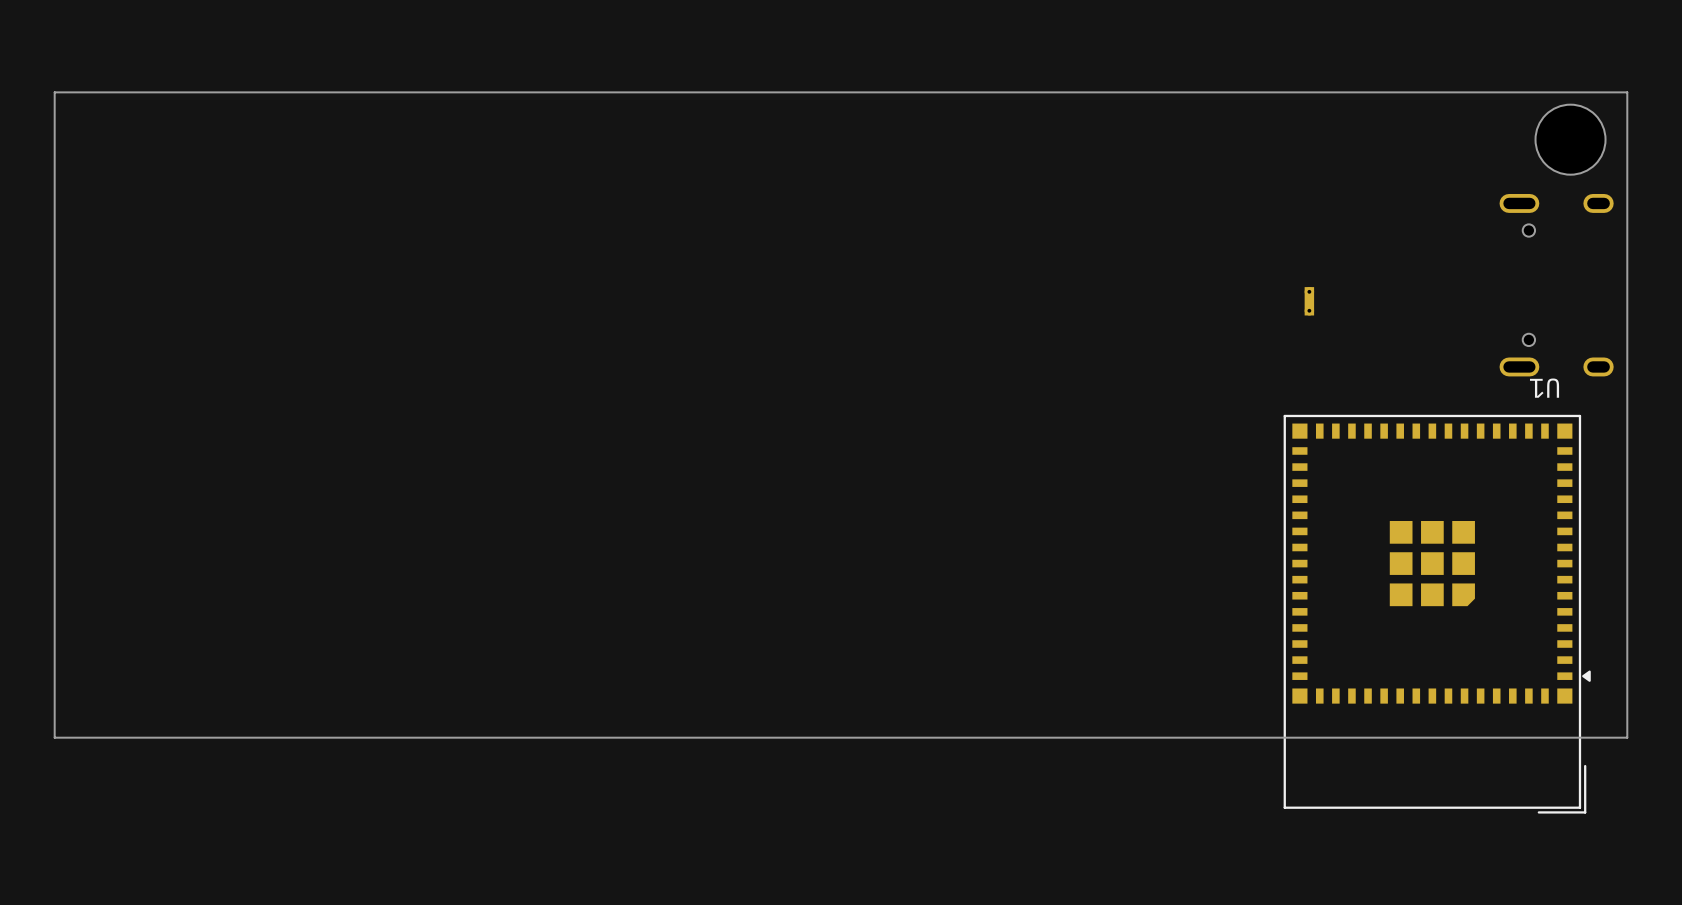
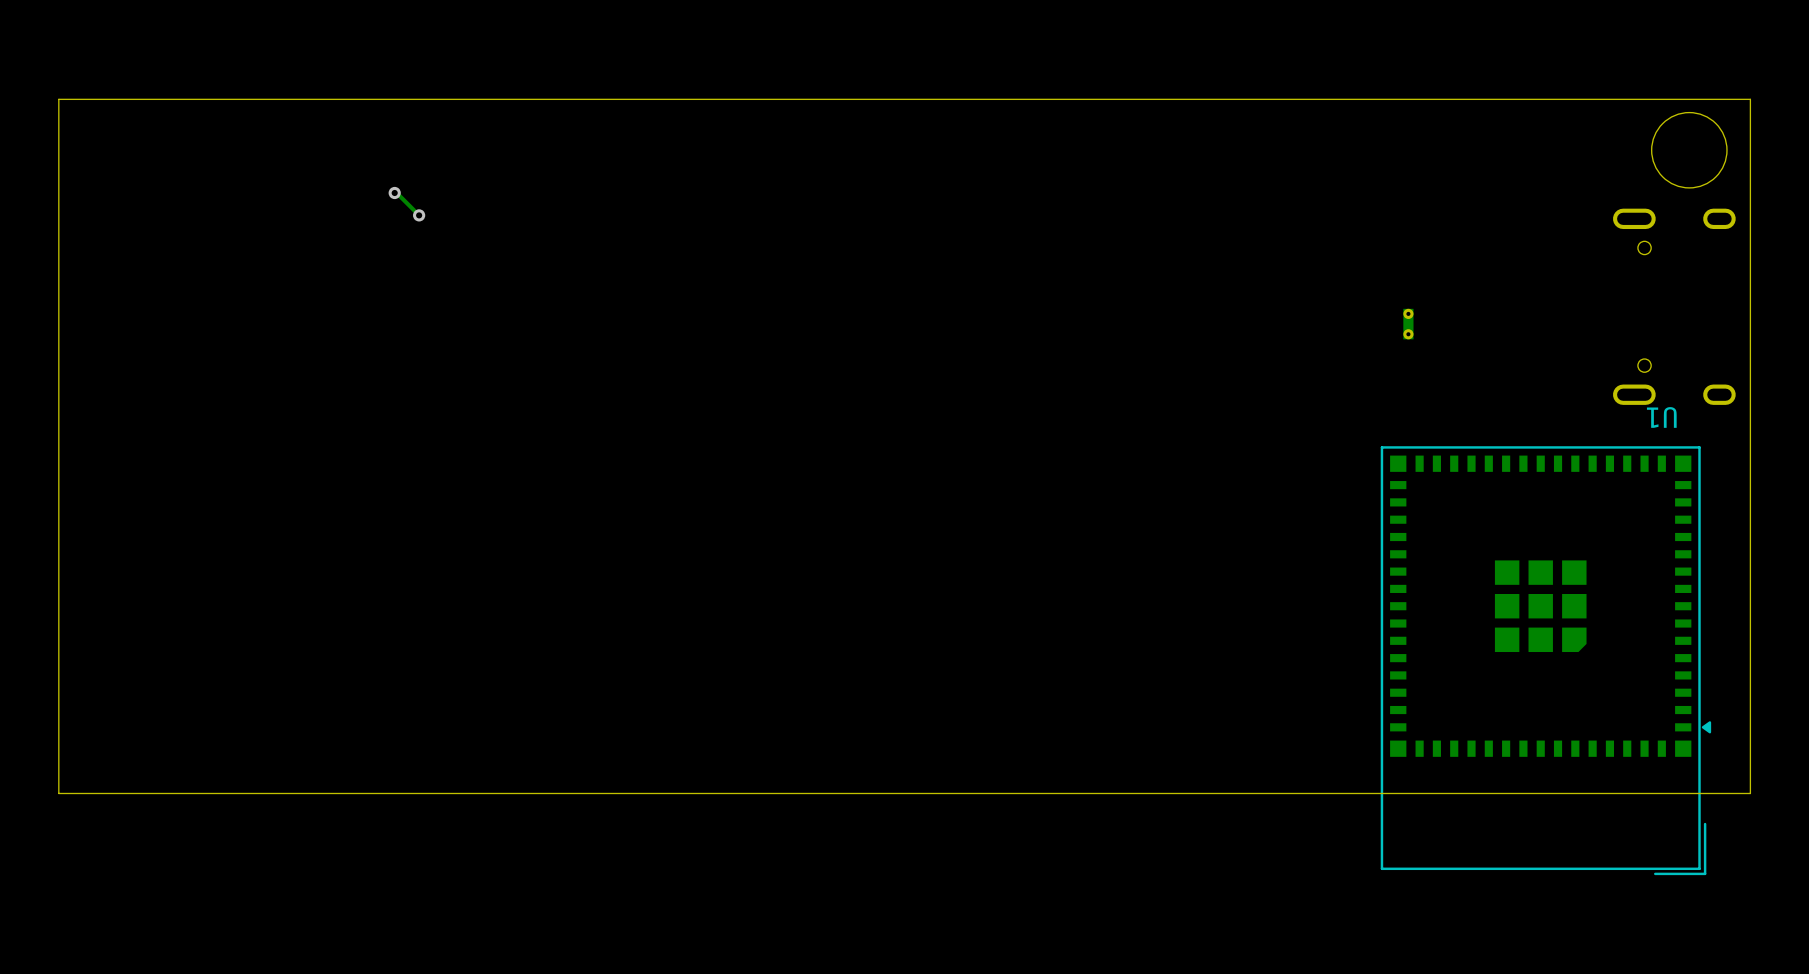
track: none -> (394, 192) (419, 215)
via: none -> (394, 192)
via: none -> (419, 215)

